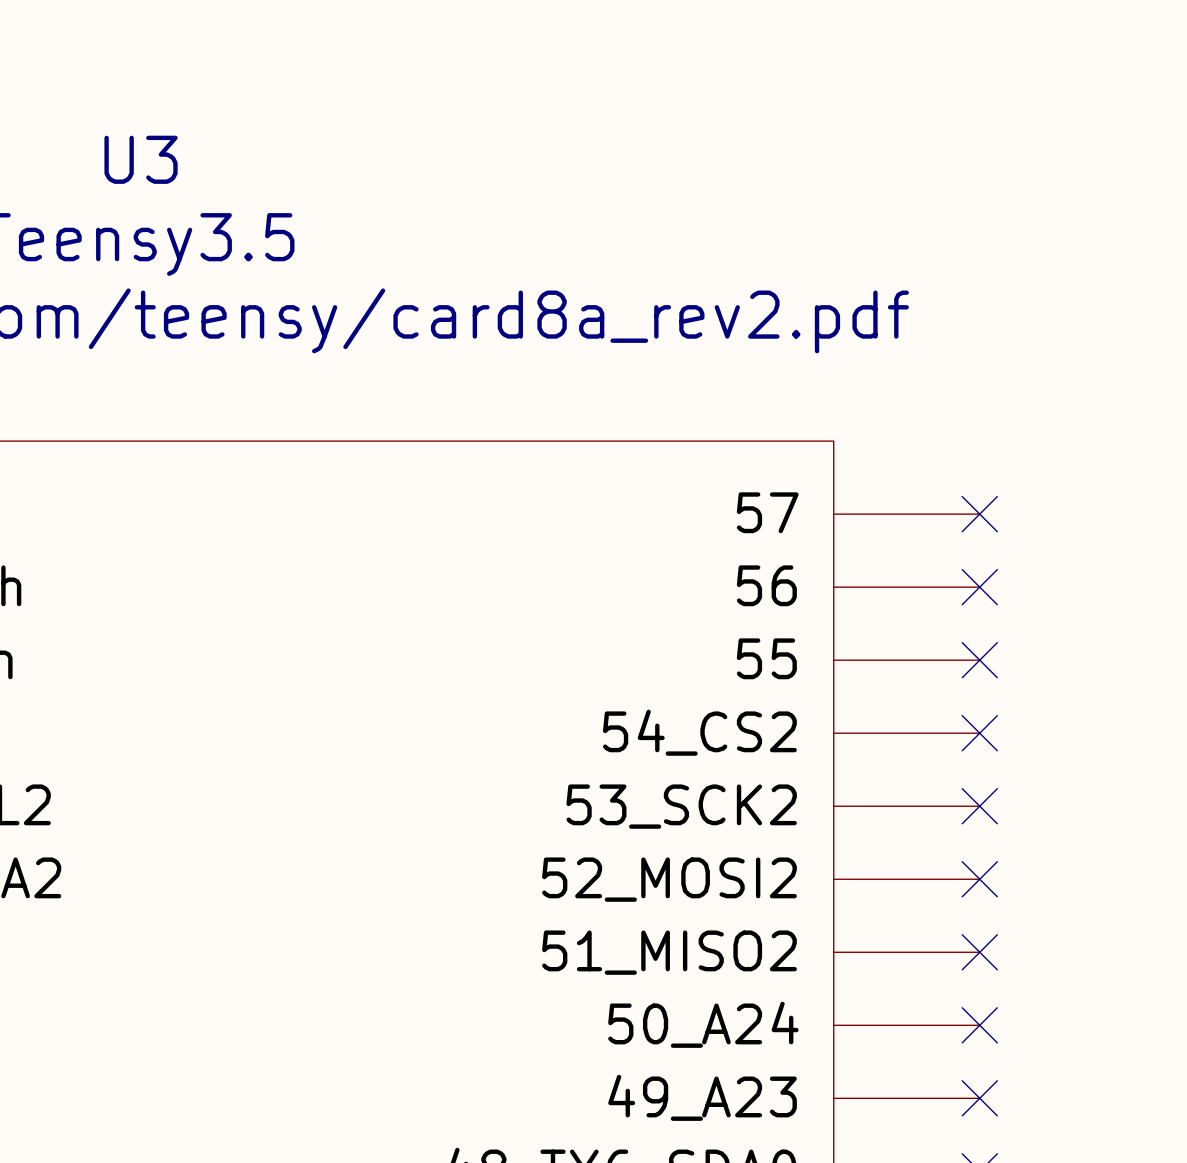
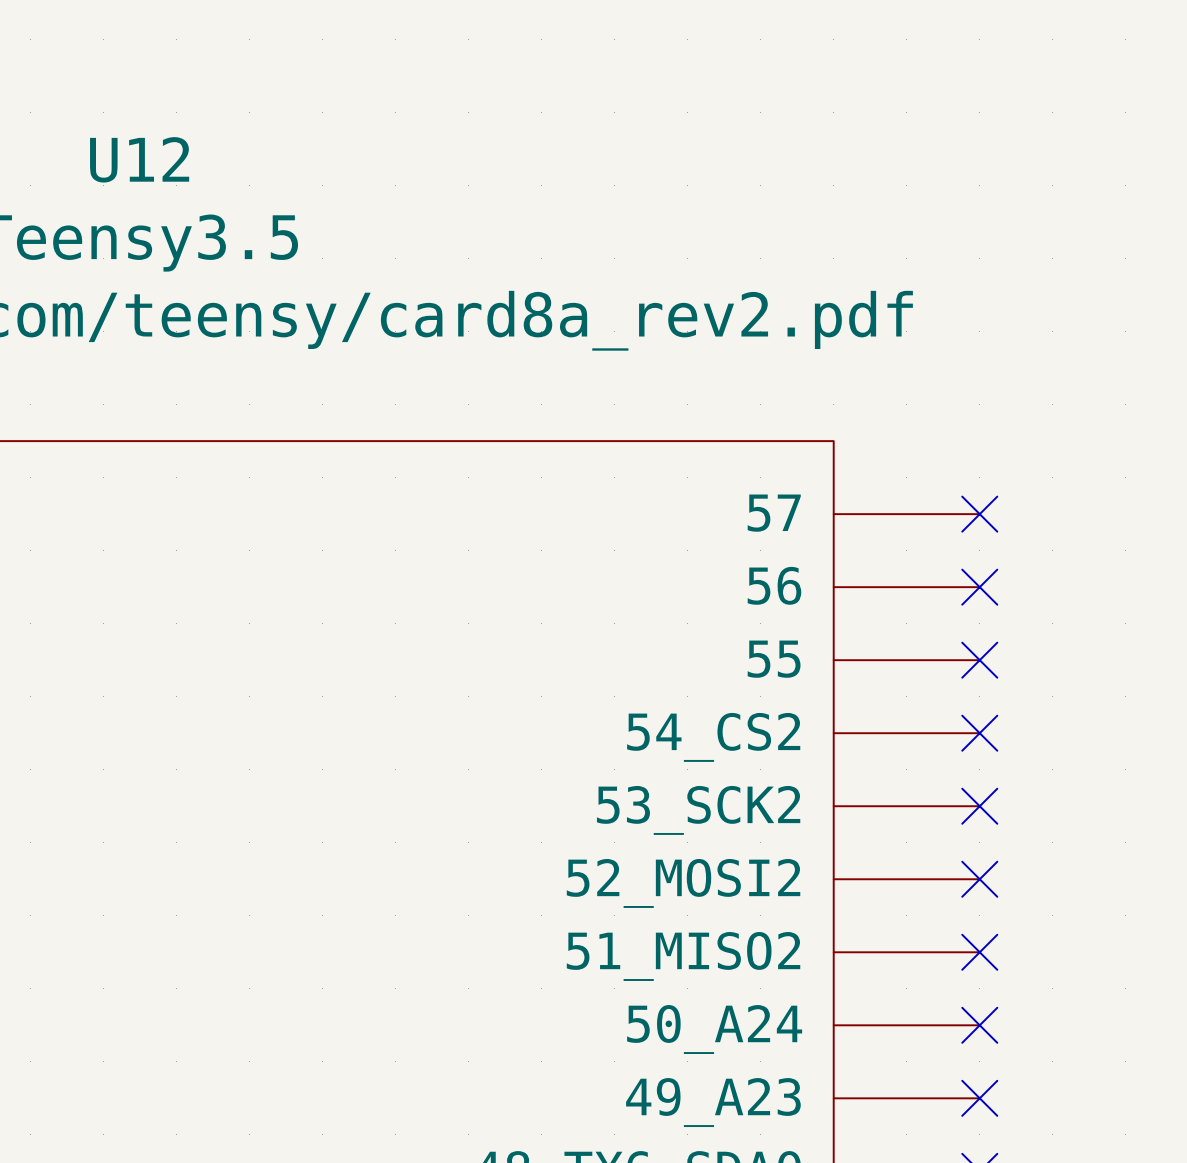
U3 name: U3 (141, 159) -> U12 (139, 159)

